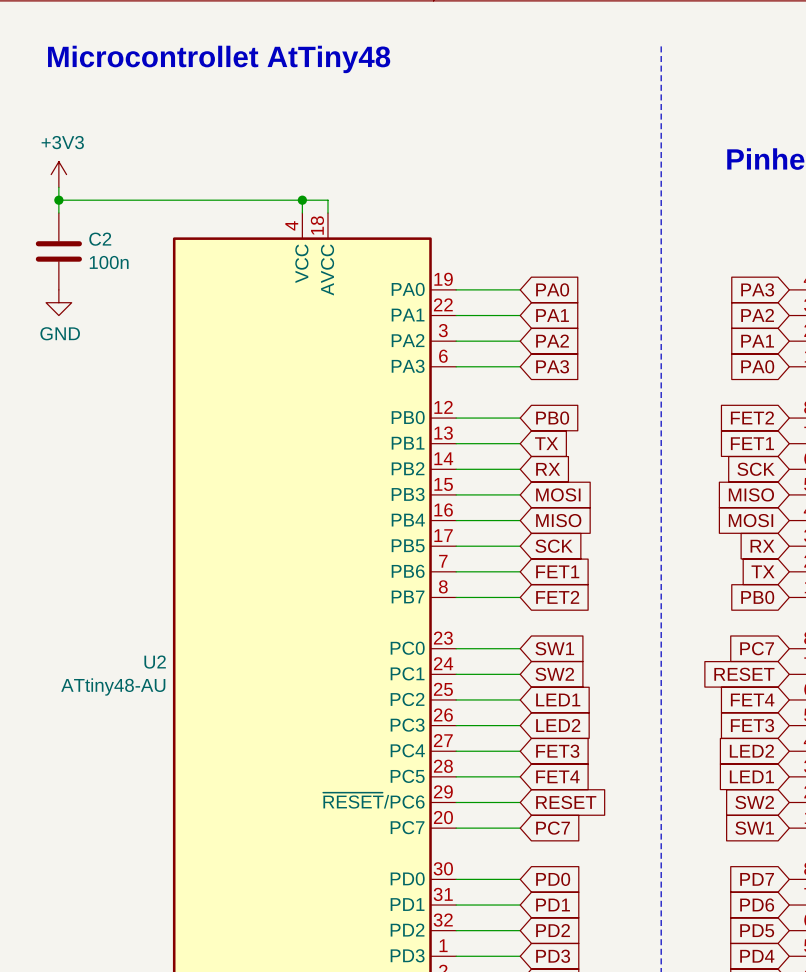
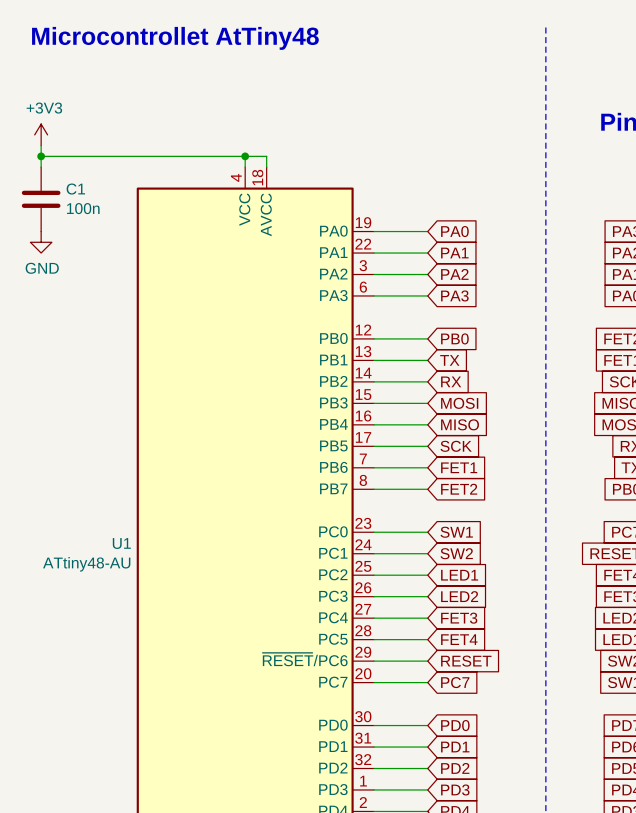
C2 name: C2 (100, 239) -> C1 (75, 189)
U2 name: U2 (155, 662) -> U1 (121, 543)

